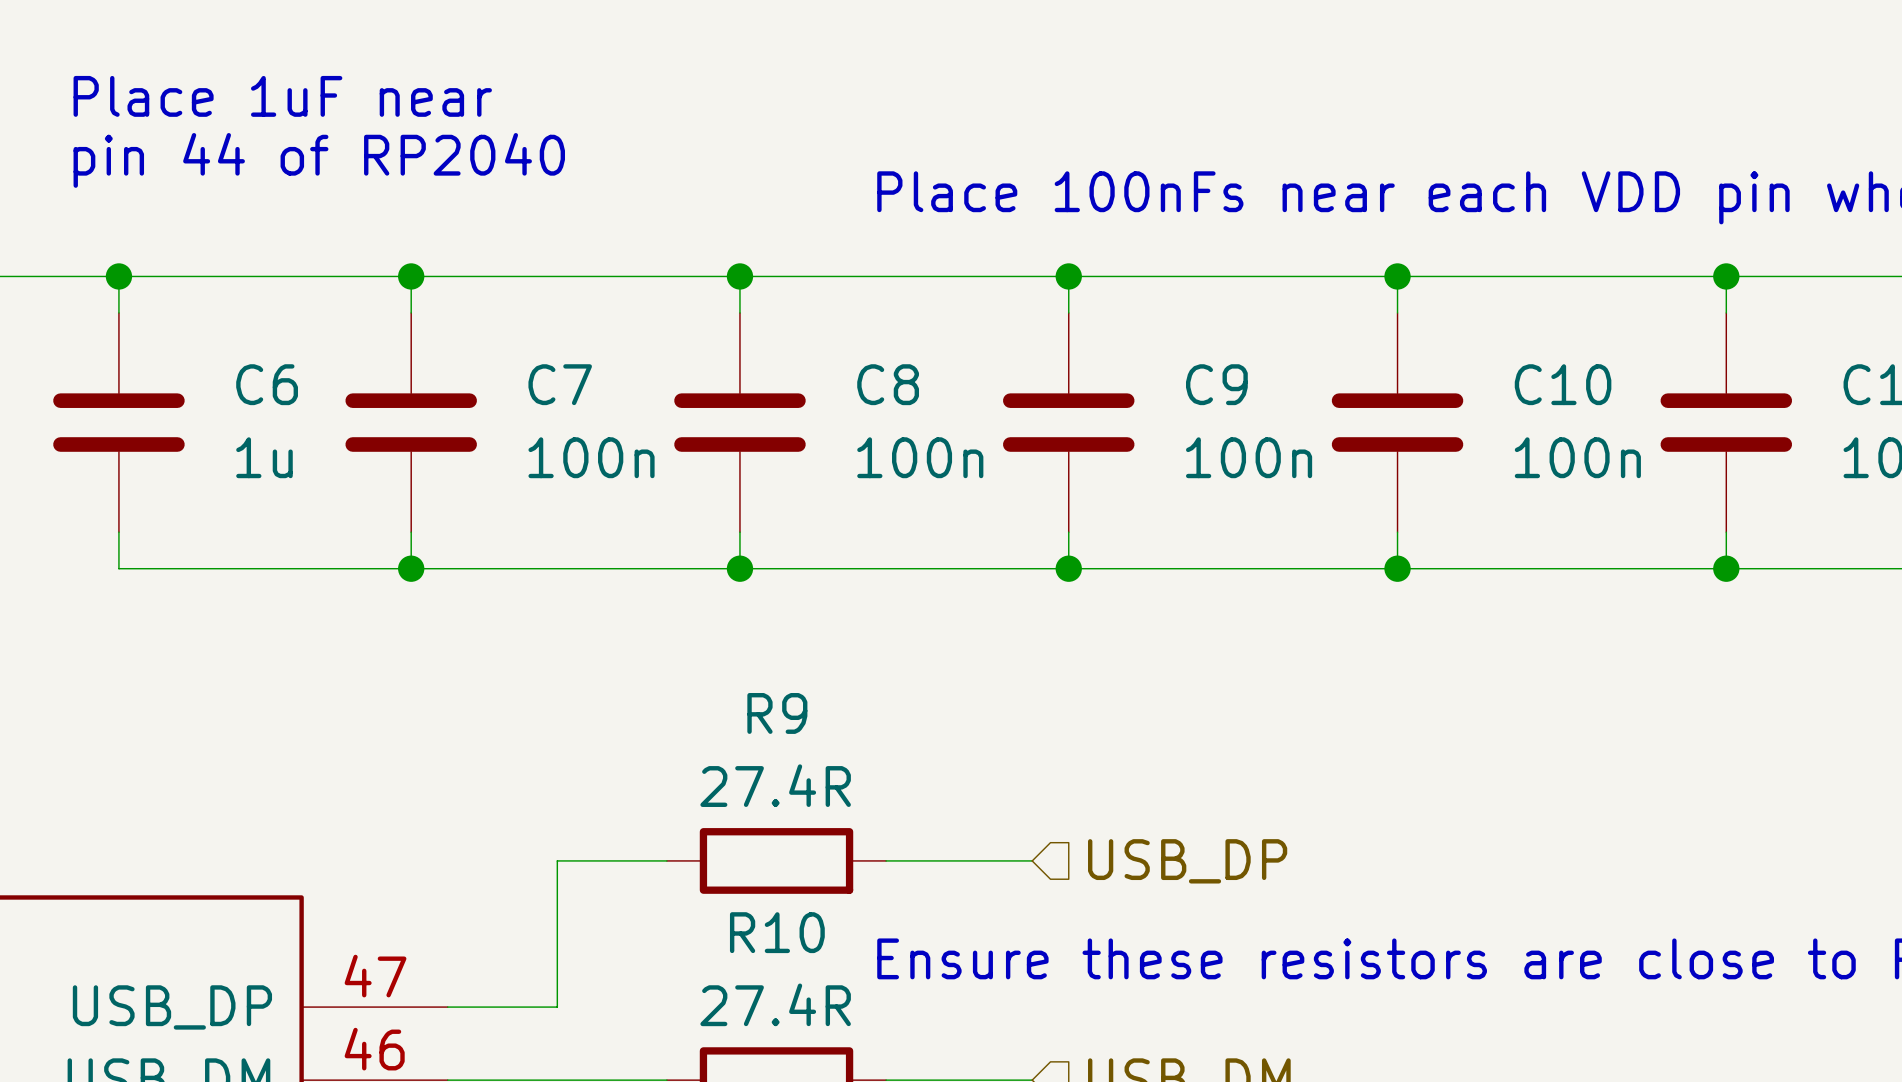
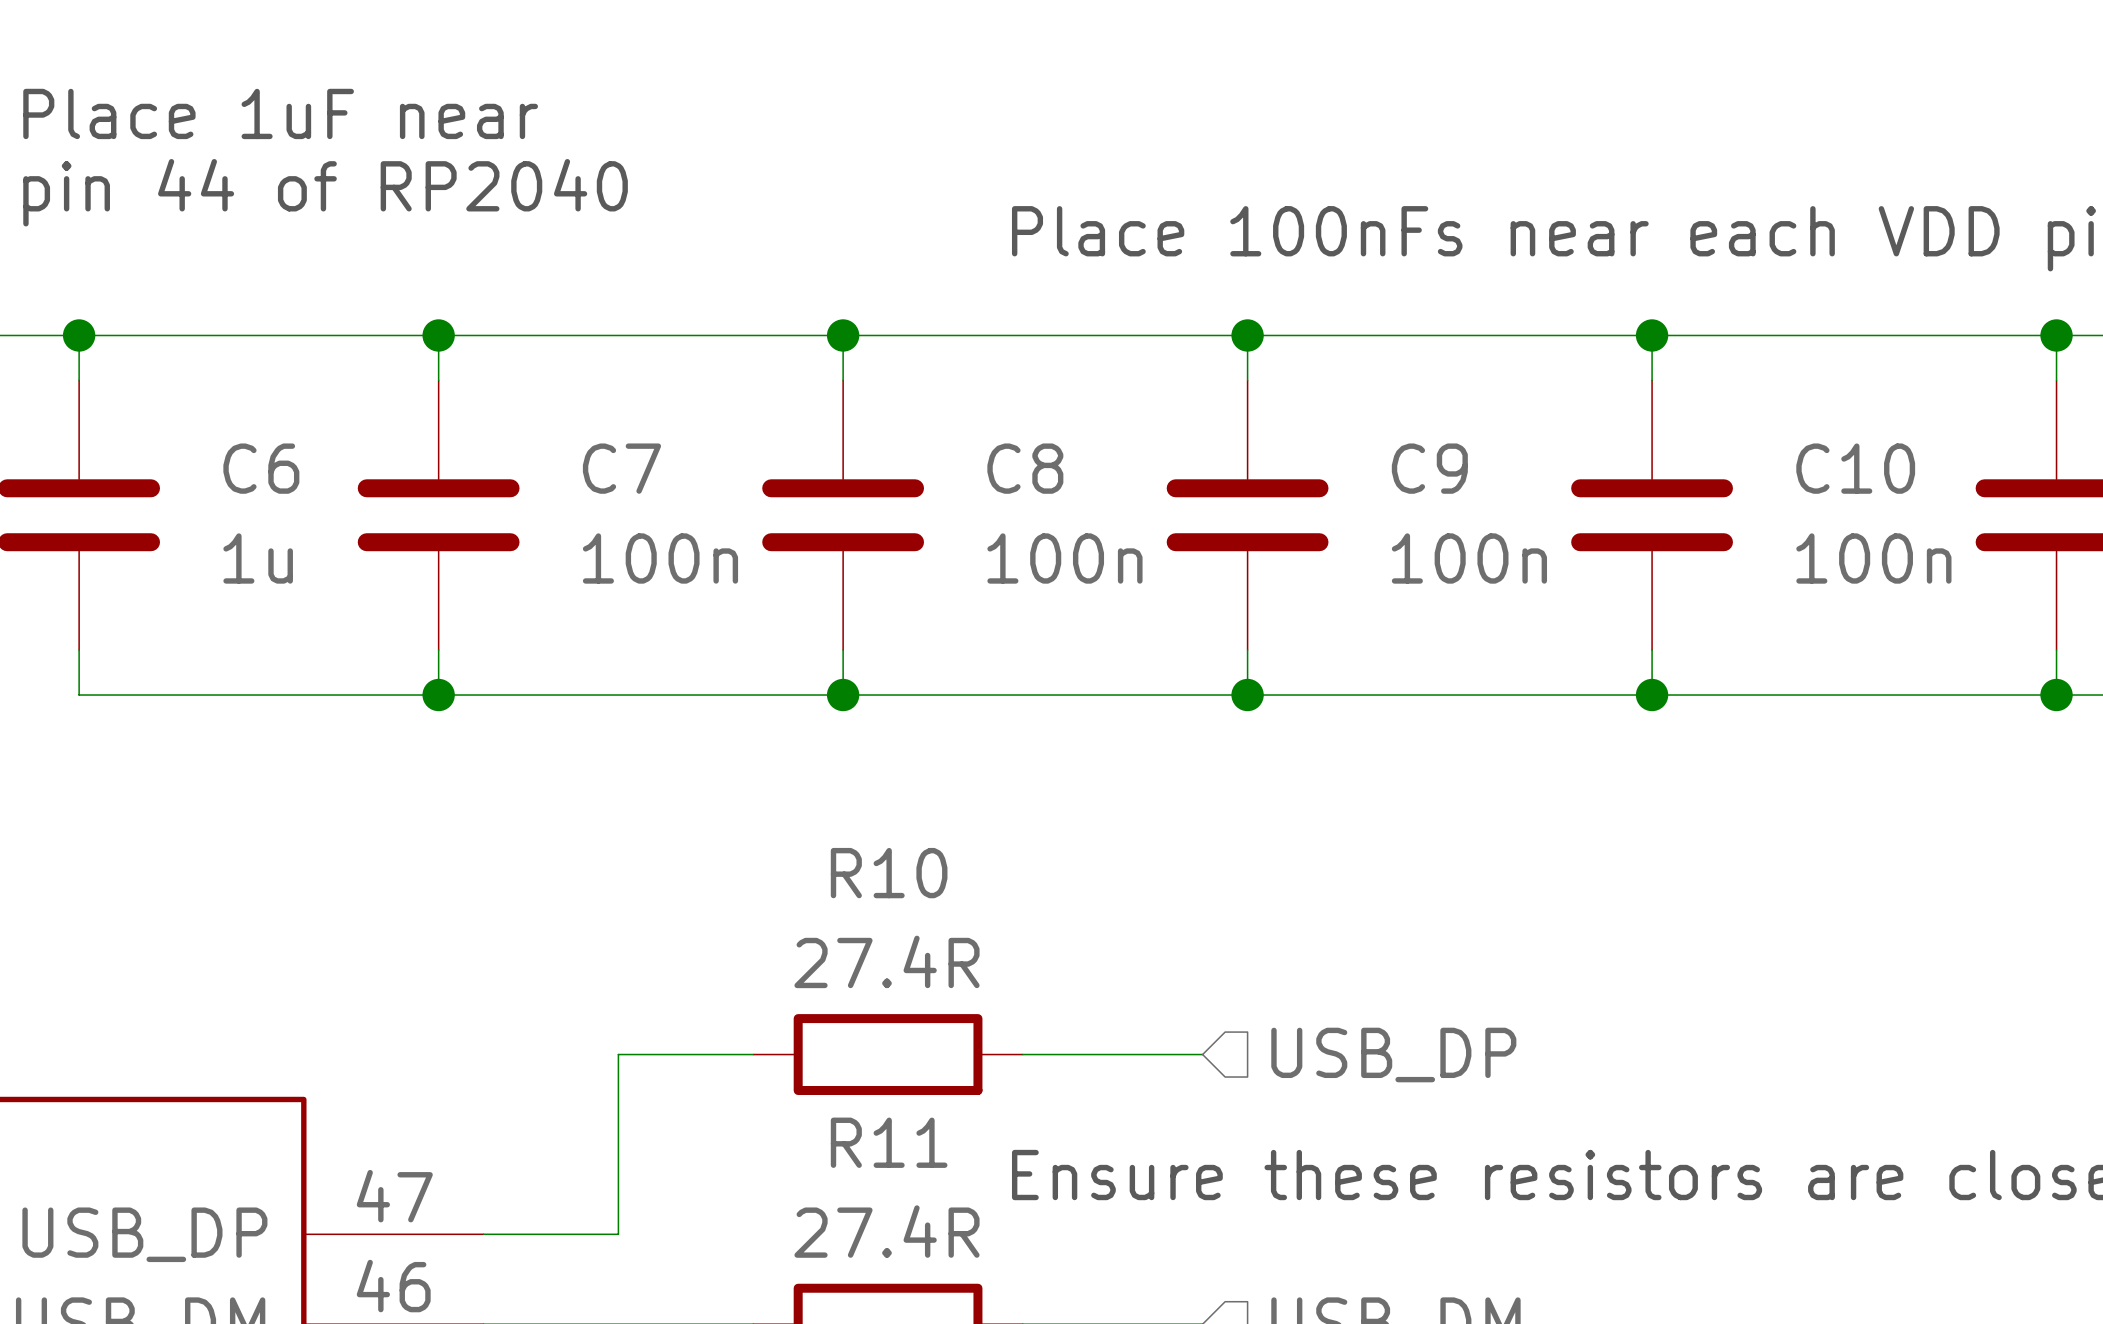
R9 name: R9 (777, 713) -> R10 (889, 873)
R10 name: R10 (777, 932) -> R11 (889, 1142)

